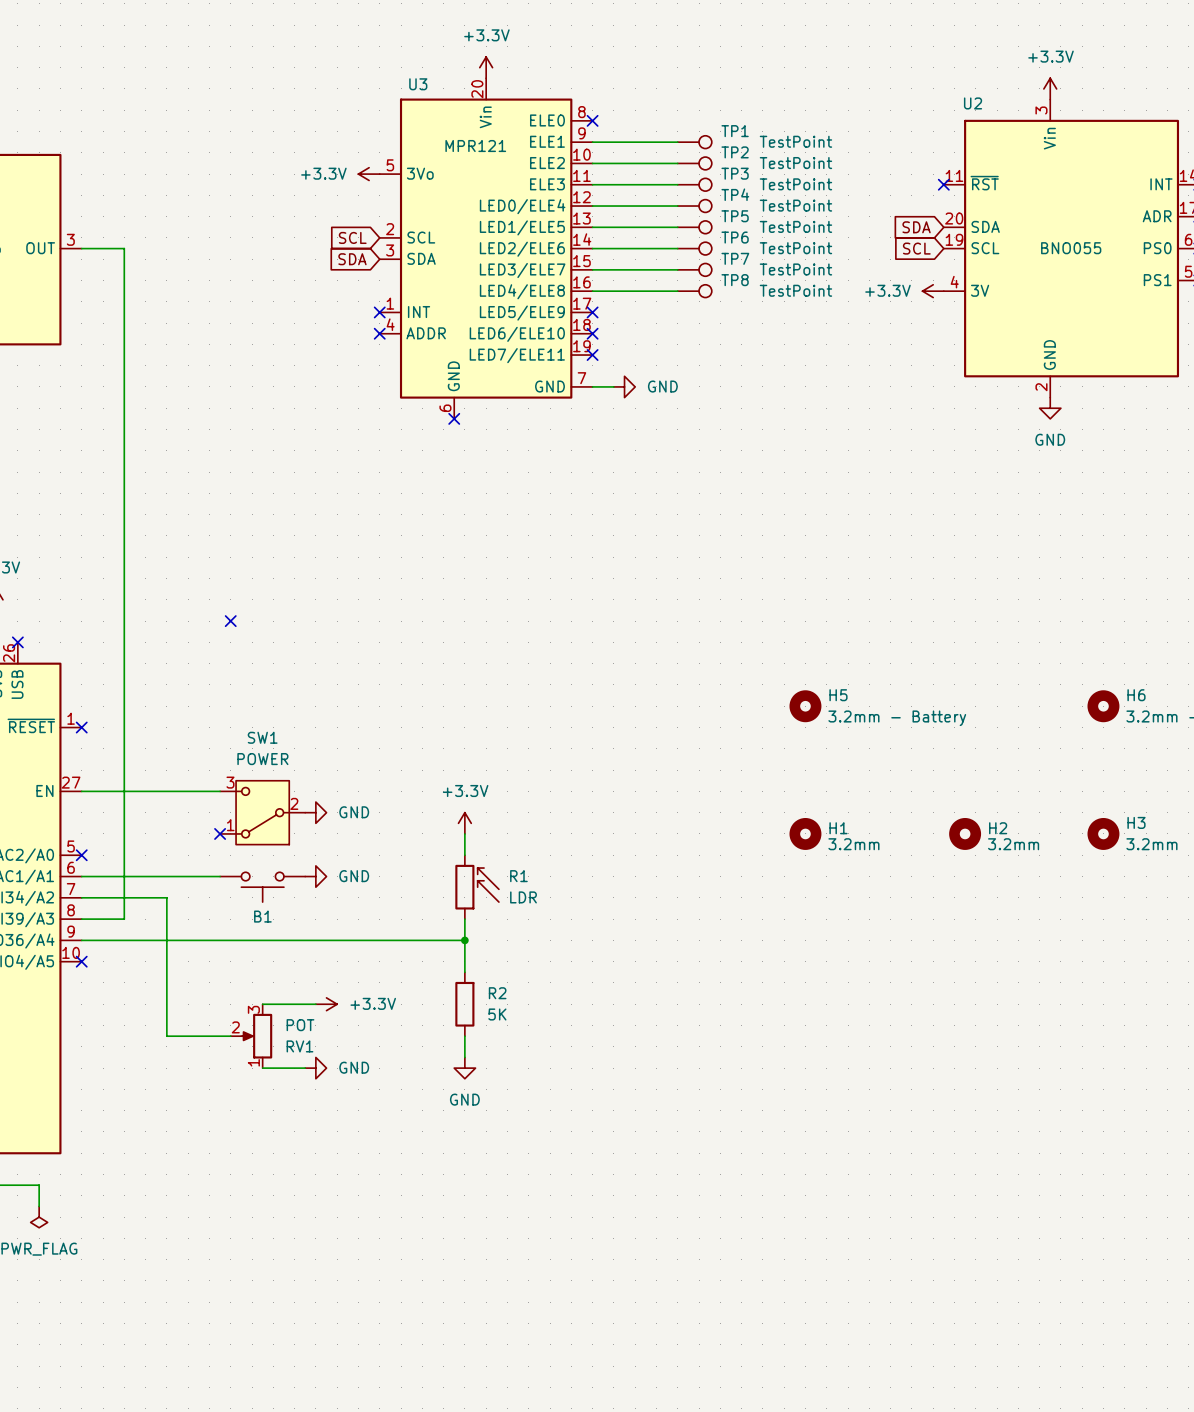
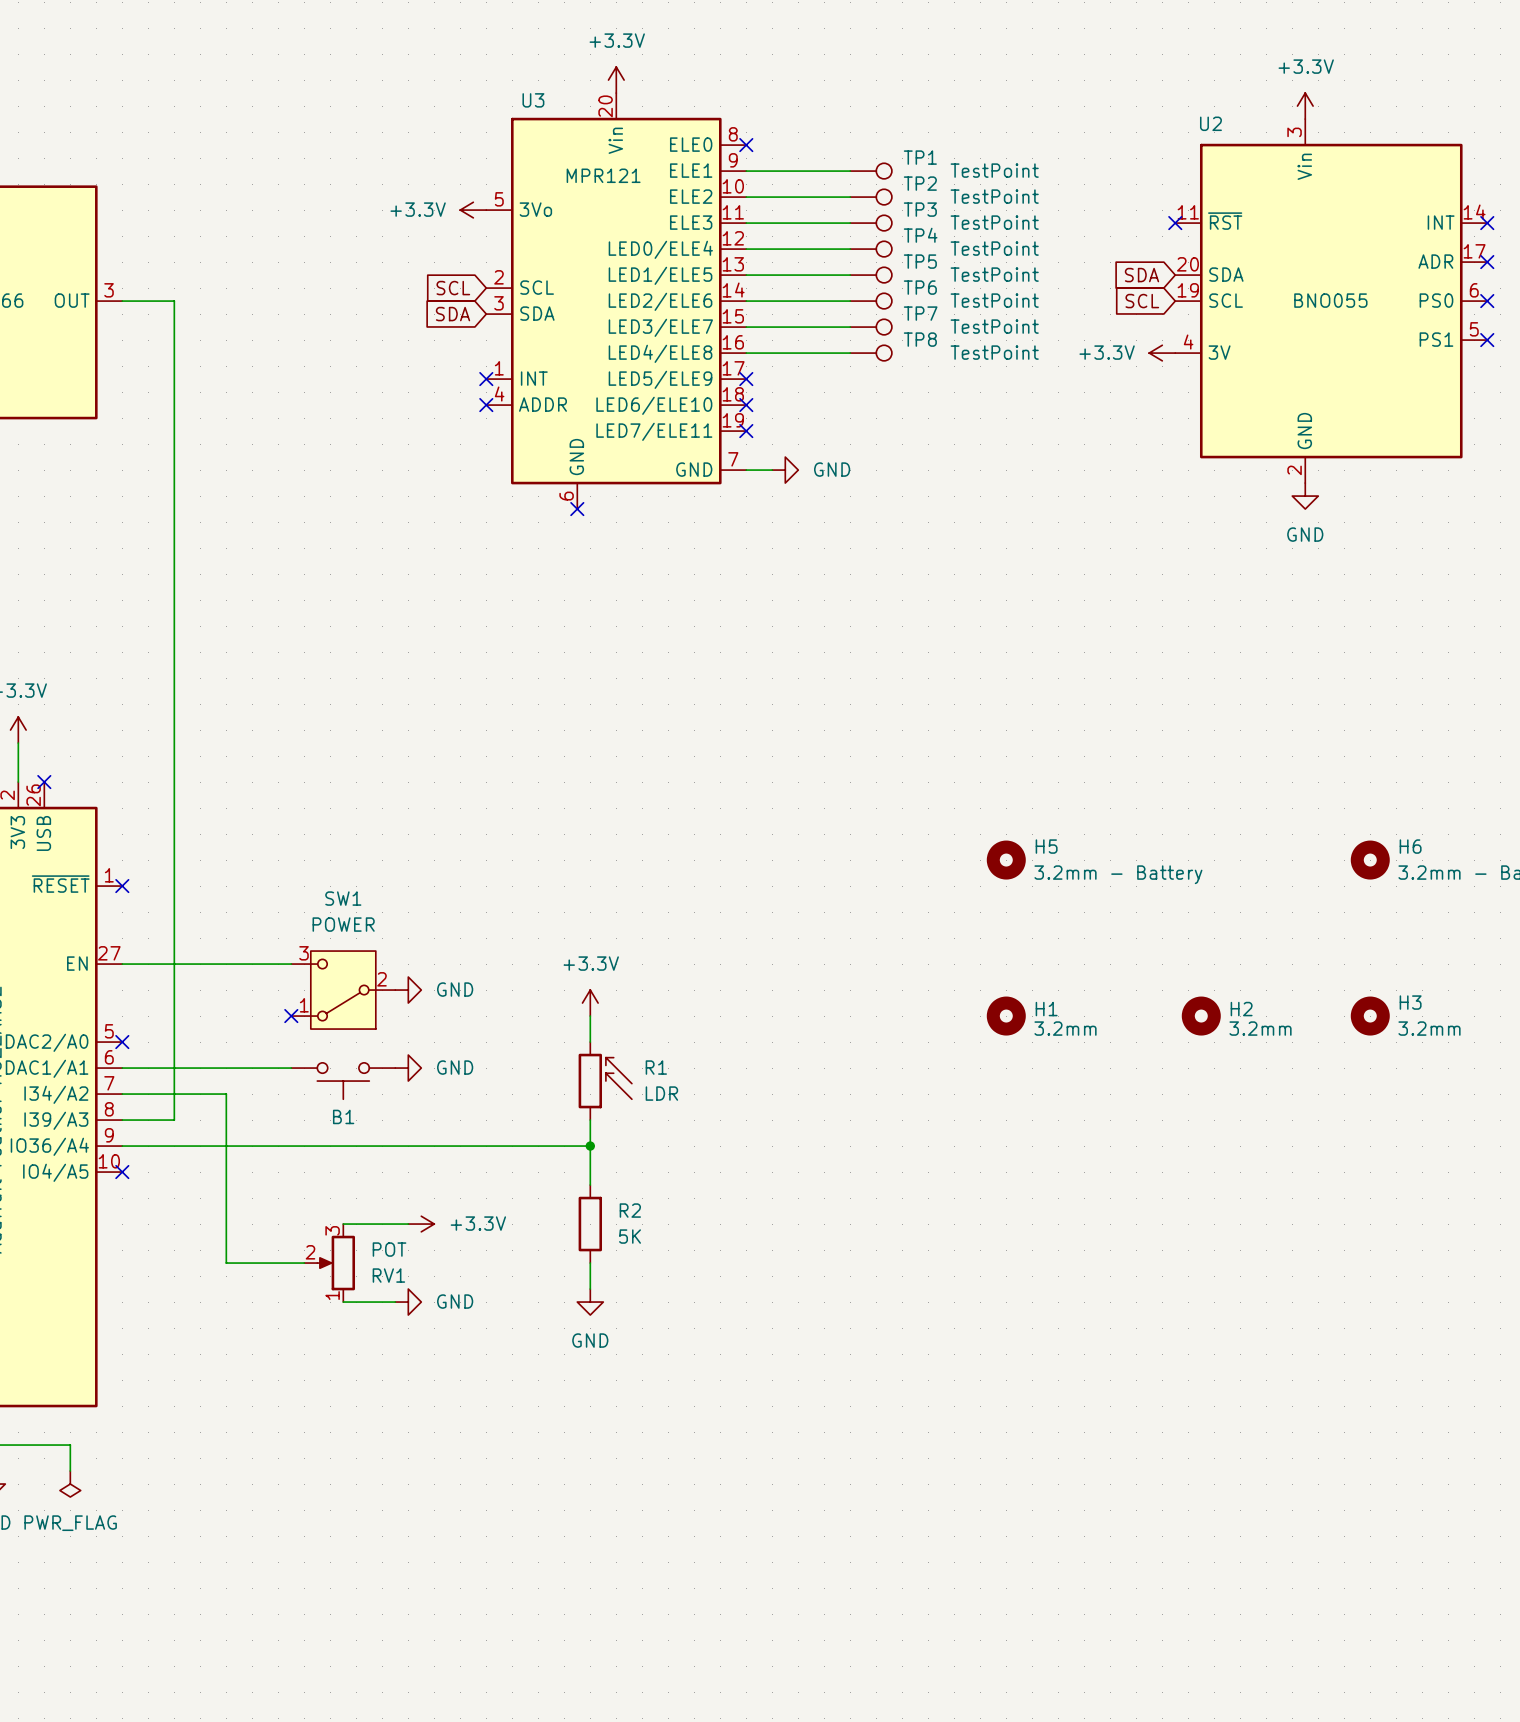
no-connect mark: (230, 621) -> none

